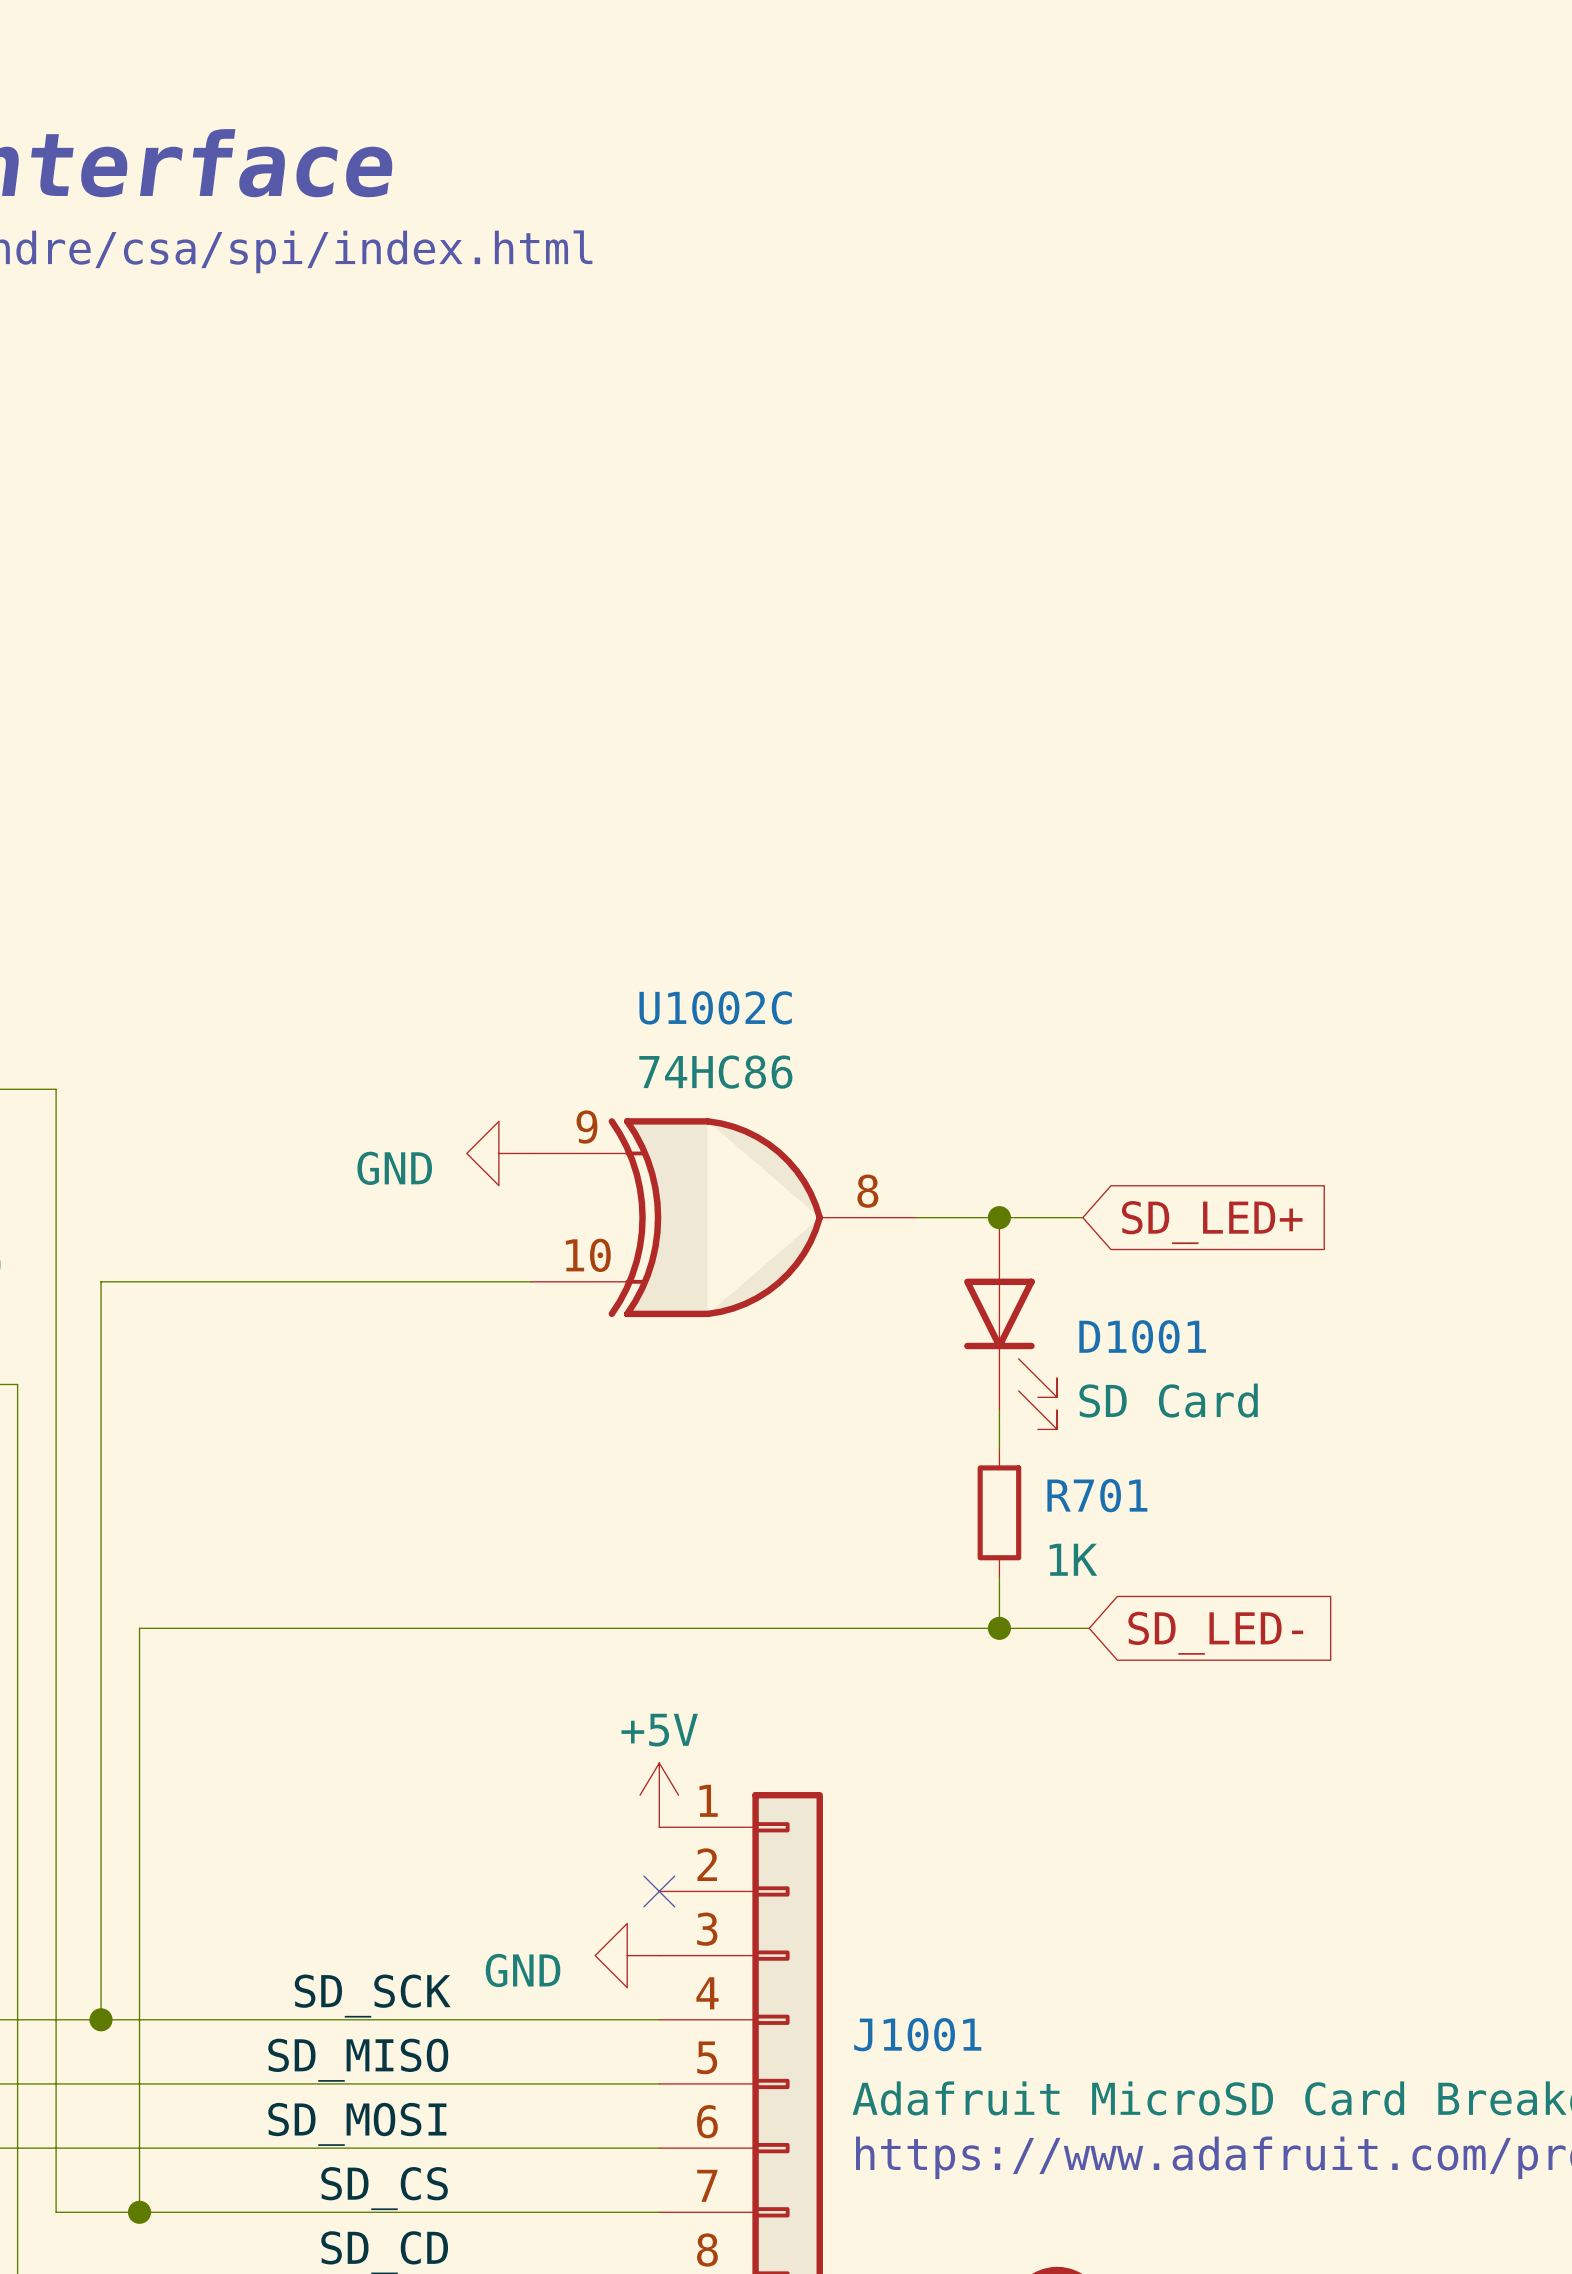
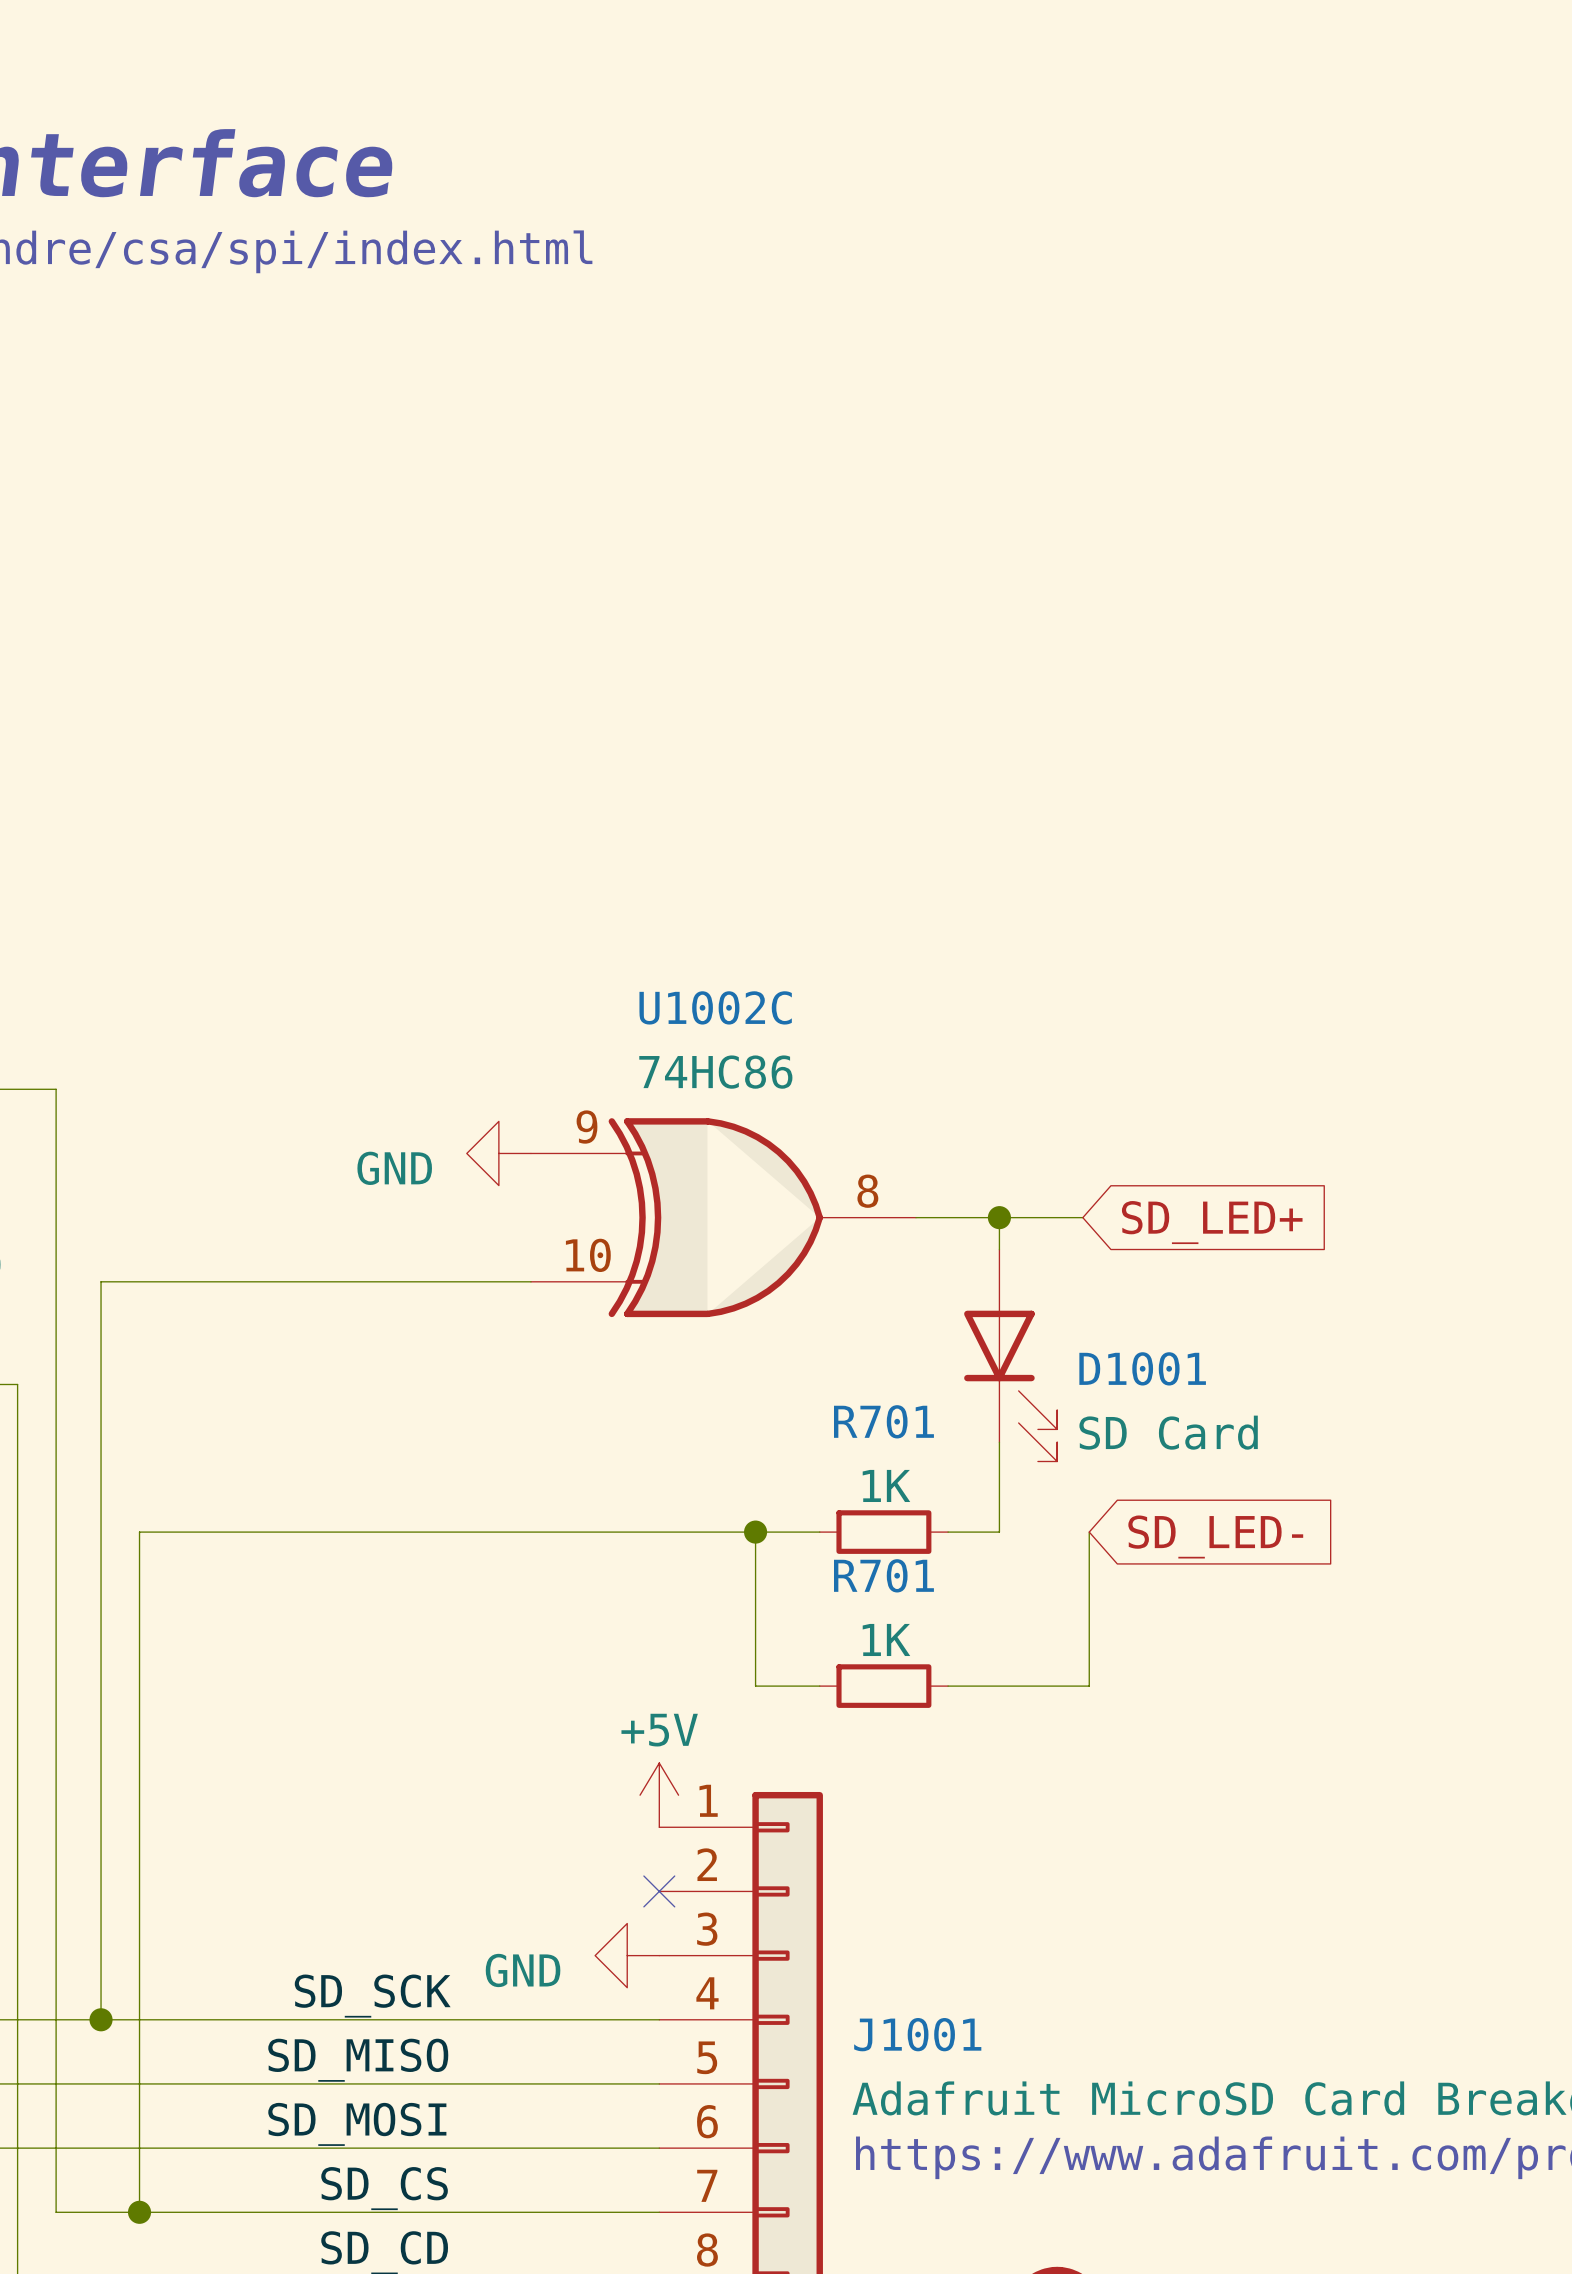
D1001 position: (1010, 1323) -> (1010, 1355)
wire: none -> (999, 1448) (999, 1532) (948, 1532)
R701: 1K (999, 1512) -> none
wire: none -> (755, 1532) (755, 1686) (819, 1686)
junction: none -> (755, 1532)
R701: none -> 1K (883, 1532)
wire: none -> (1089, 1532) (1089, 1686) (948, 1686)
wire: (999, 1577) (999, 1628) -> none
wire: (139, 1628) (1089, 1628) -> (139, 1628) (139, 1532) (819, 1532)
junction: (999, 1628) -> none
global label position: SD_LED- (1215, 1633) -> SD_LED- (1215, 1536)
R701: none -> 1K (883, 1686)

